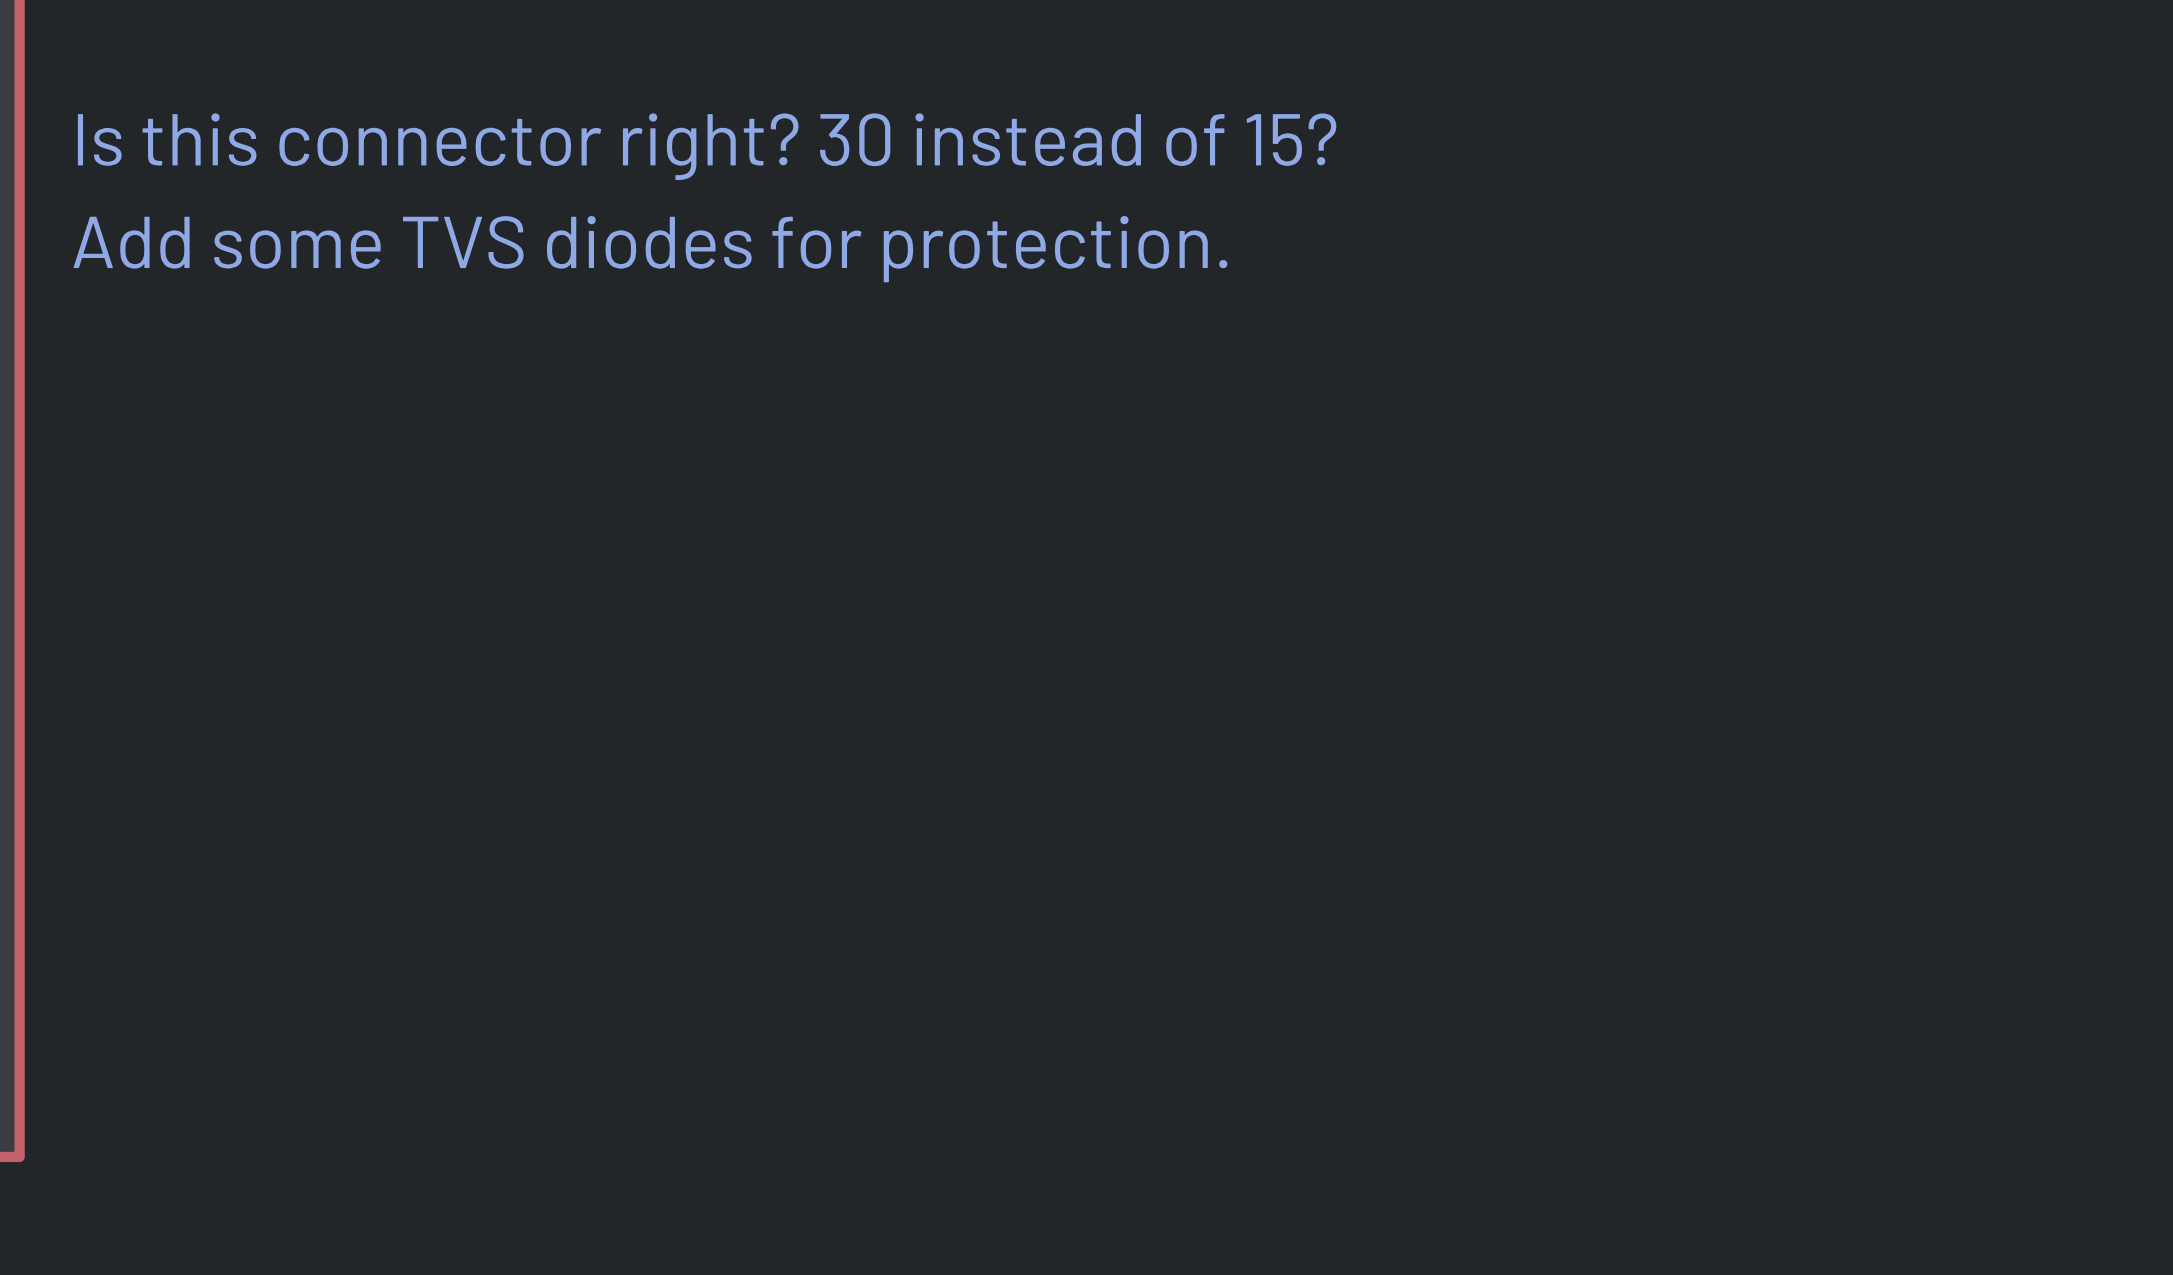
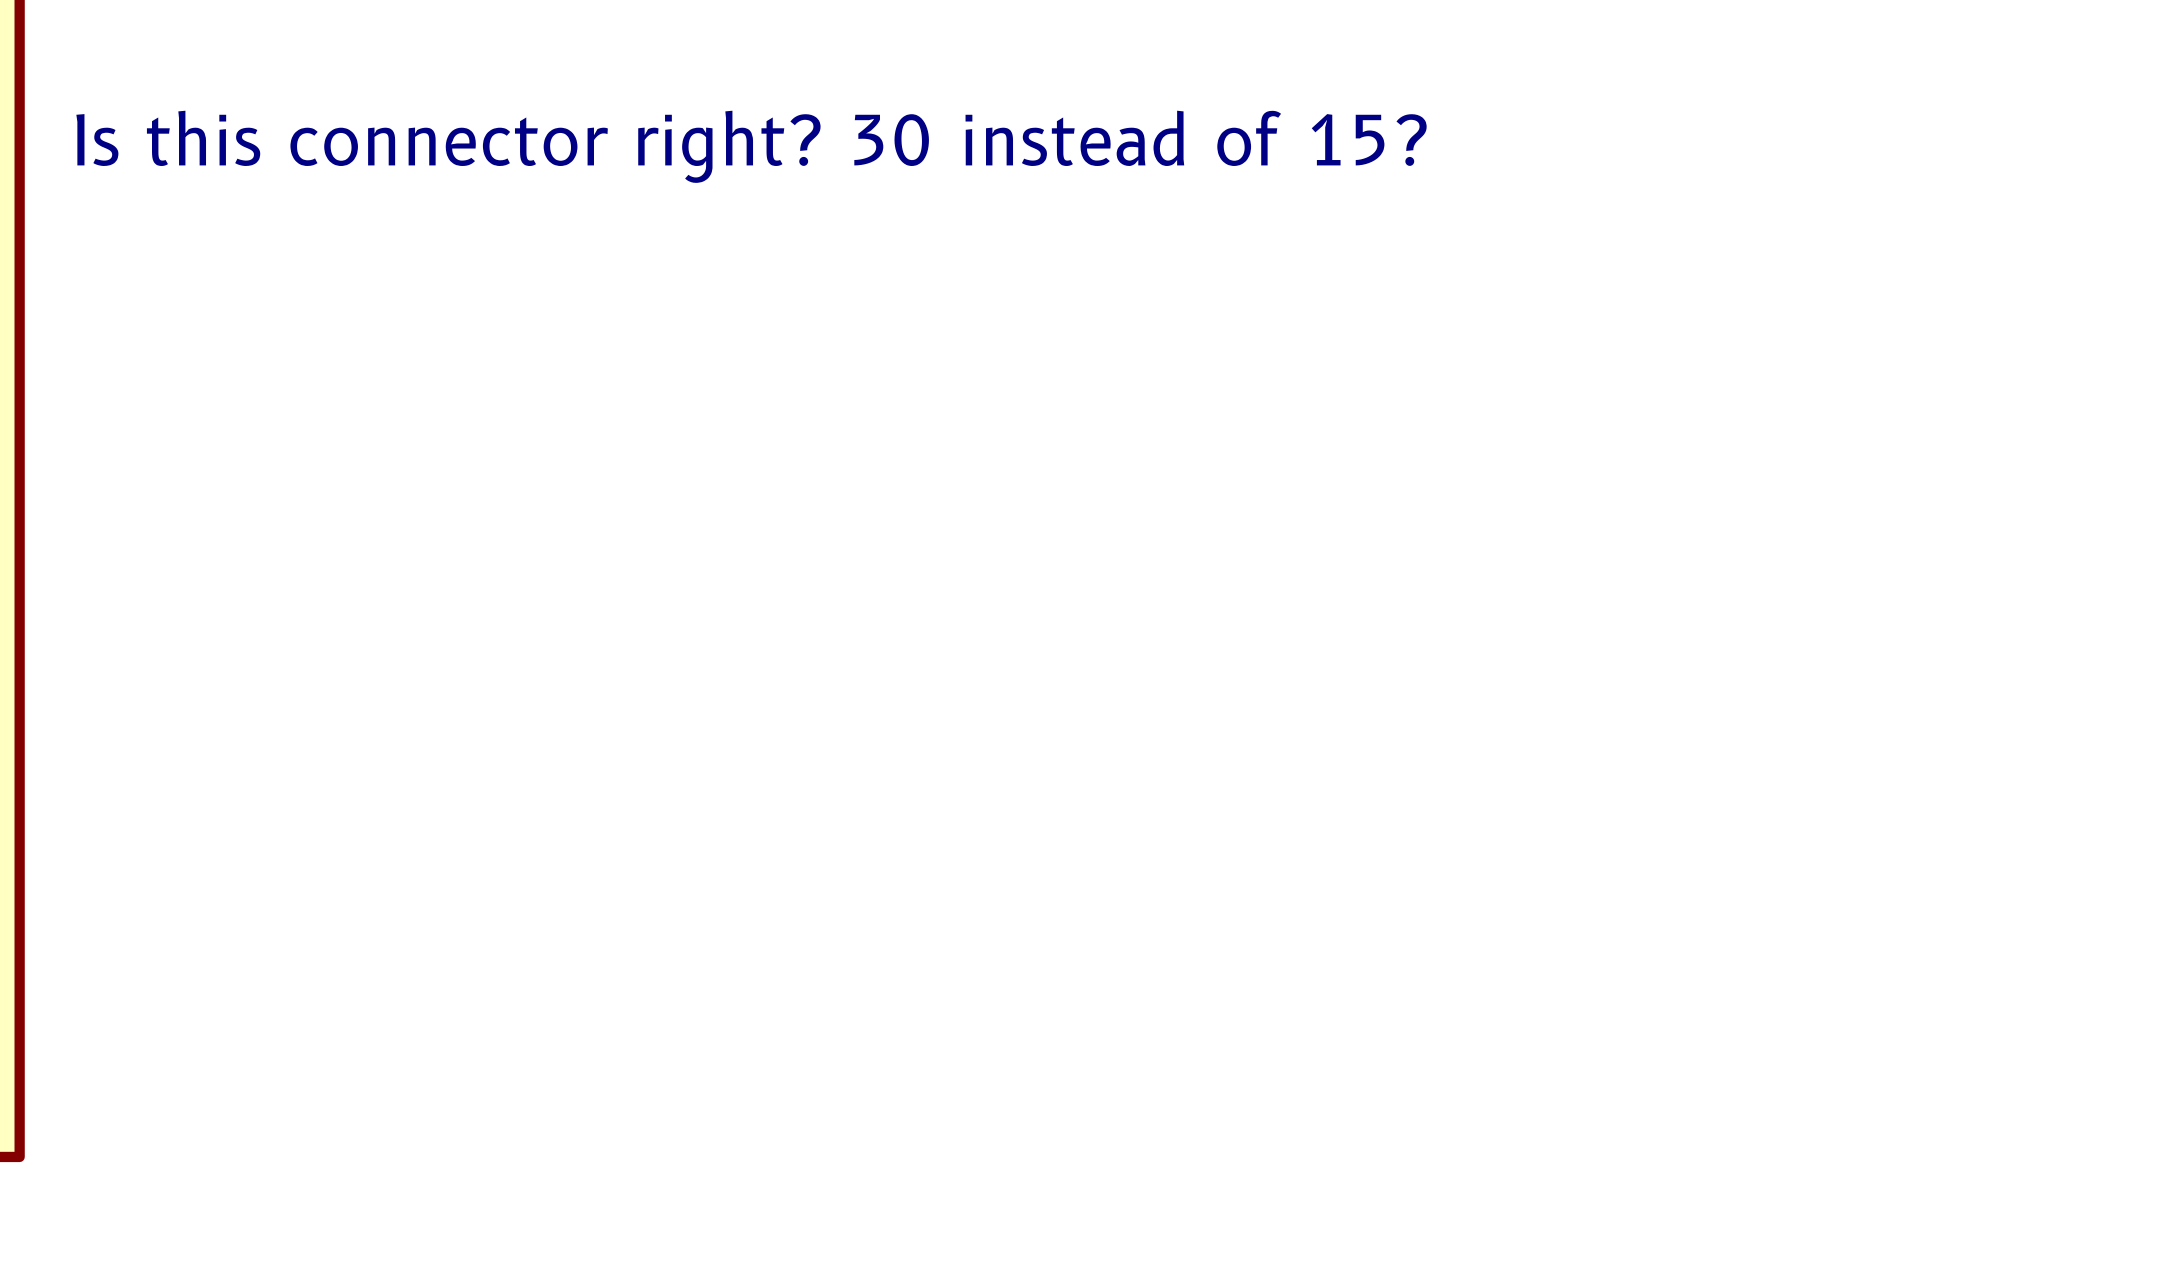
text: Add some TVS diodes for protection. (650, 249) -> none

